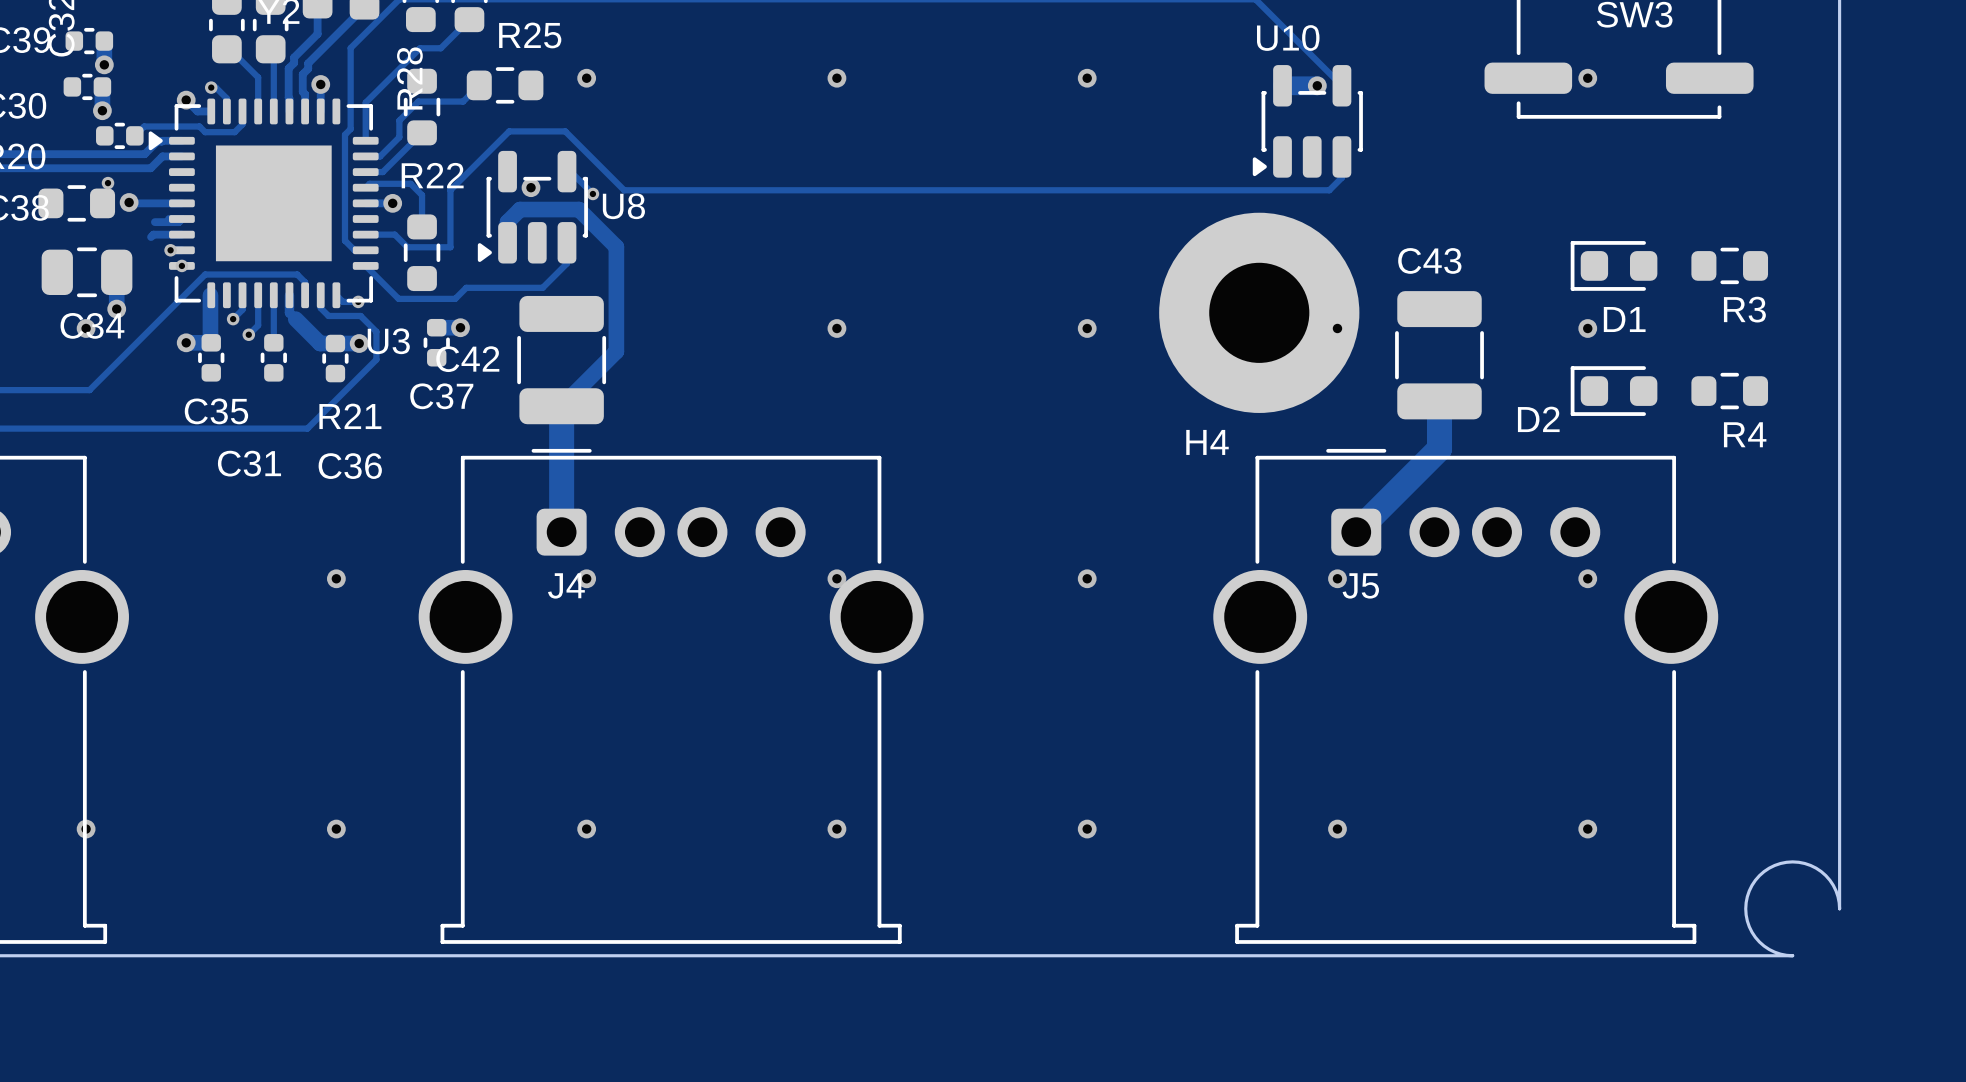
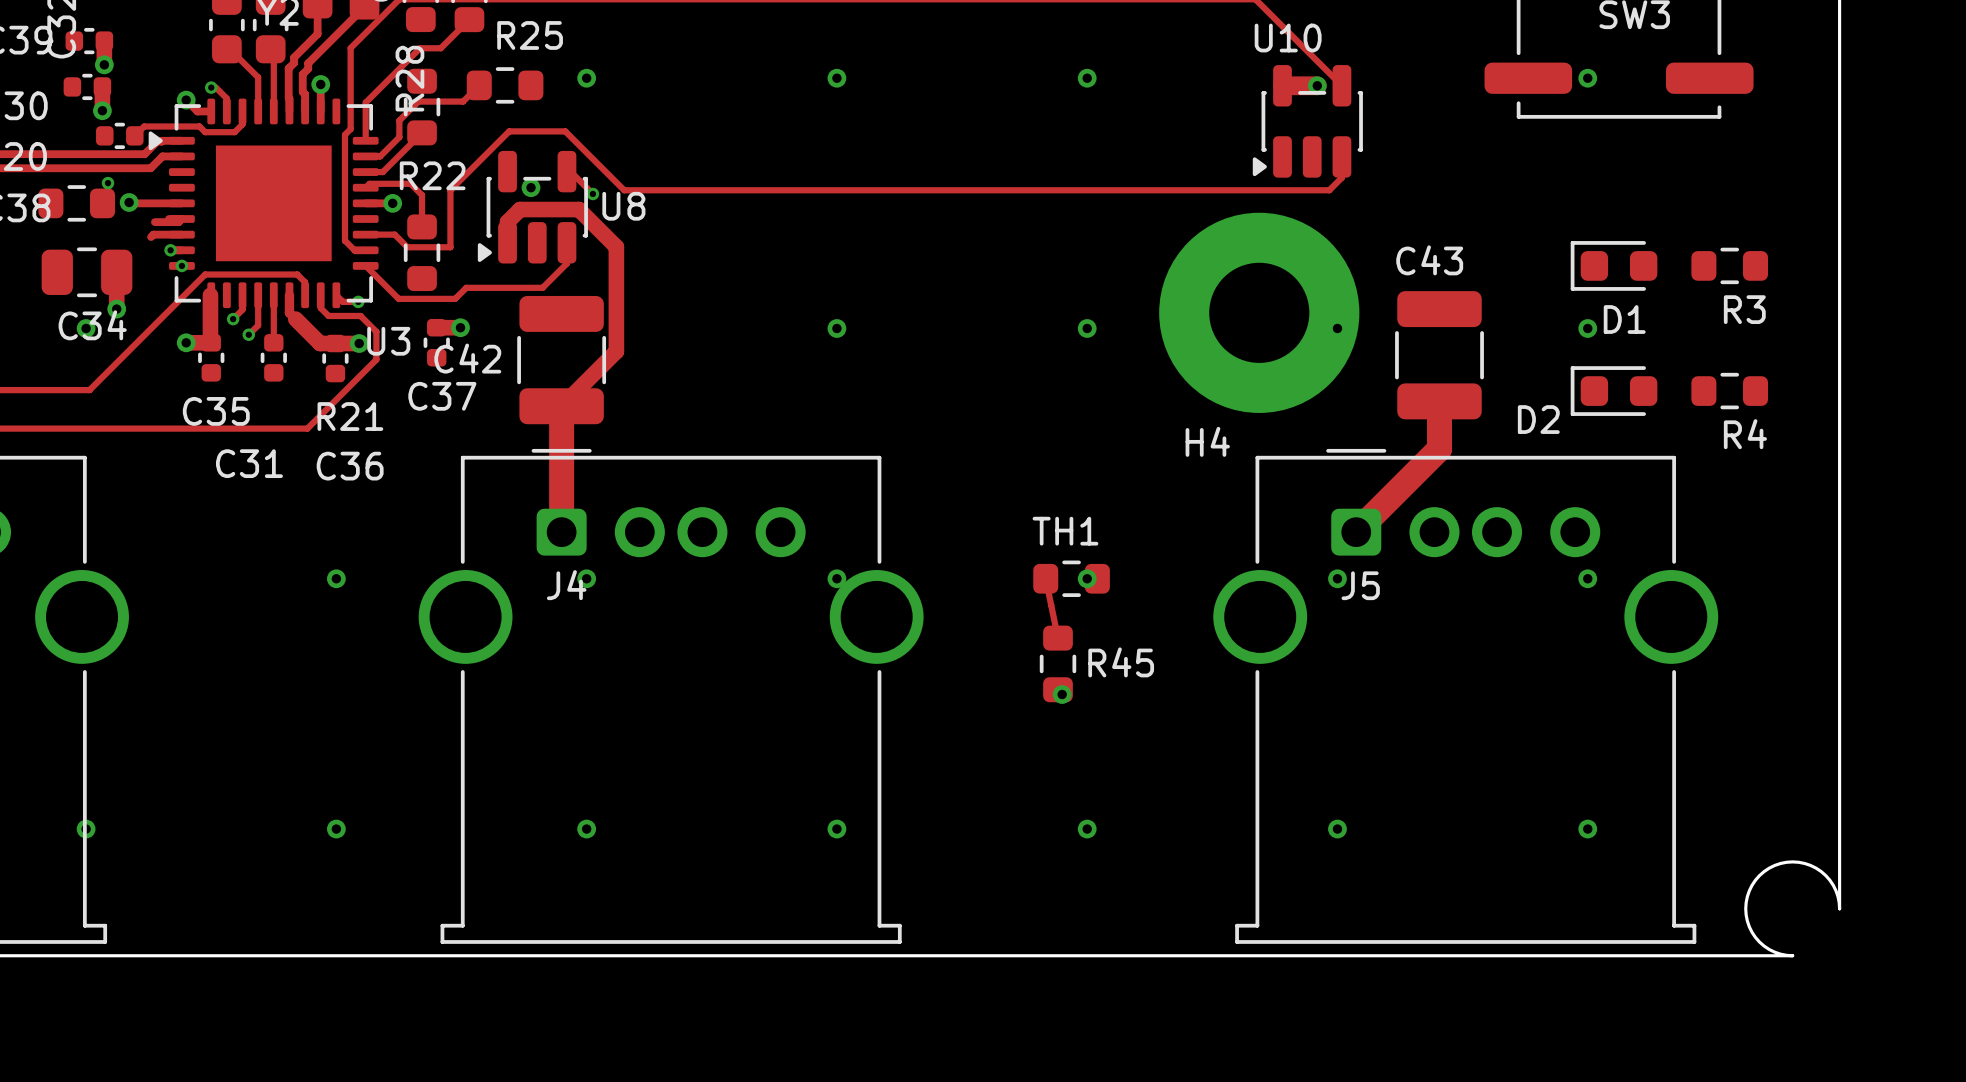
track: none -> (1045, 578) (1058, 638)
TH1: none -> (1071, 578)
R45: none -> (1058, 663)
via: none -> (1062, 694)

